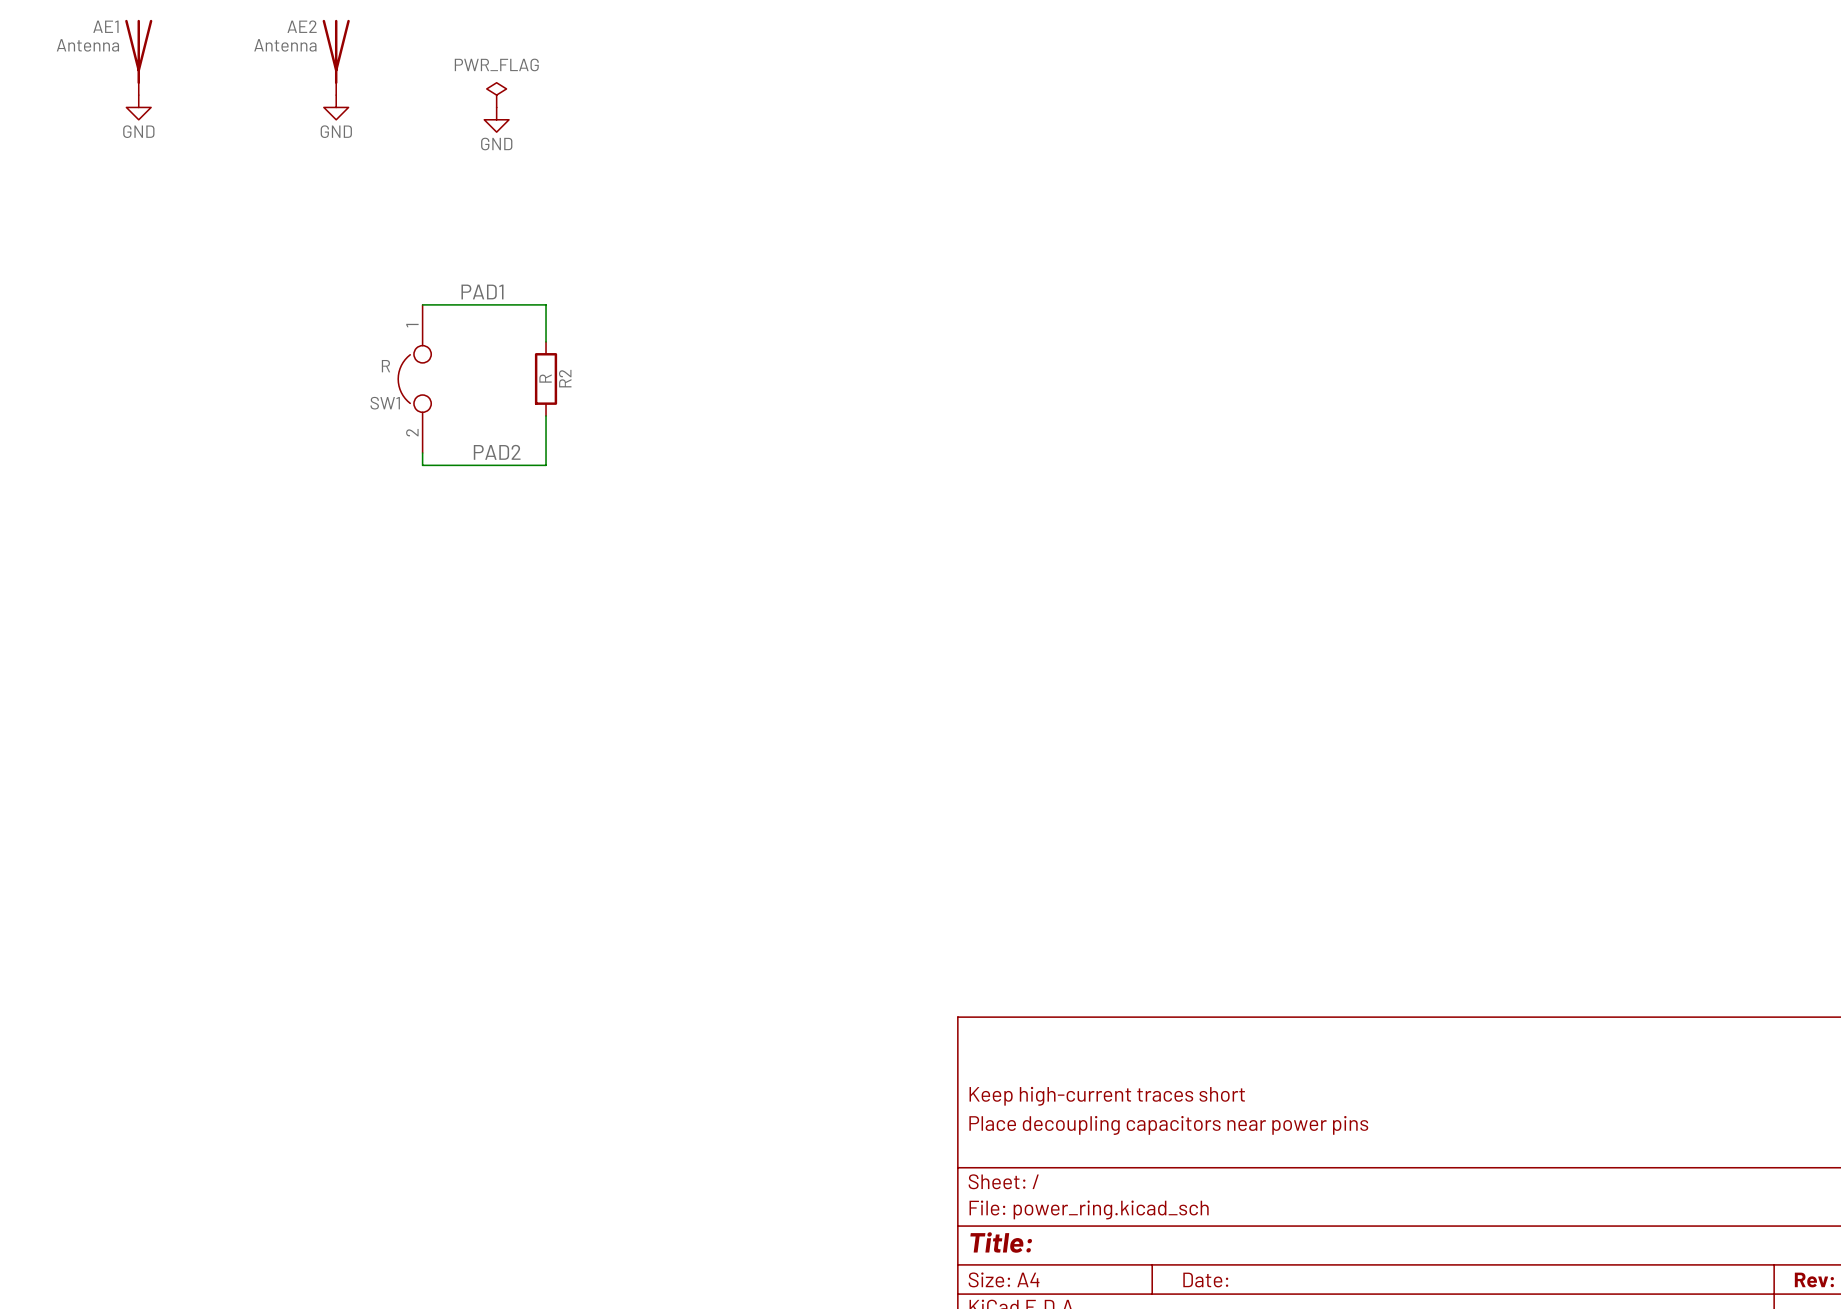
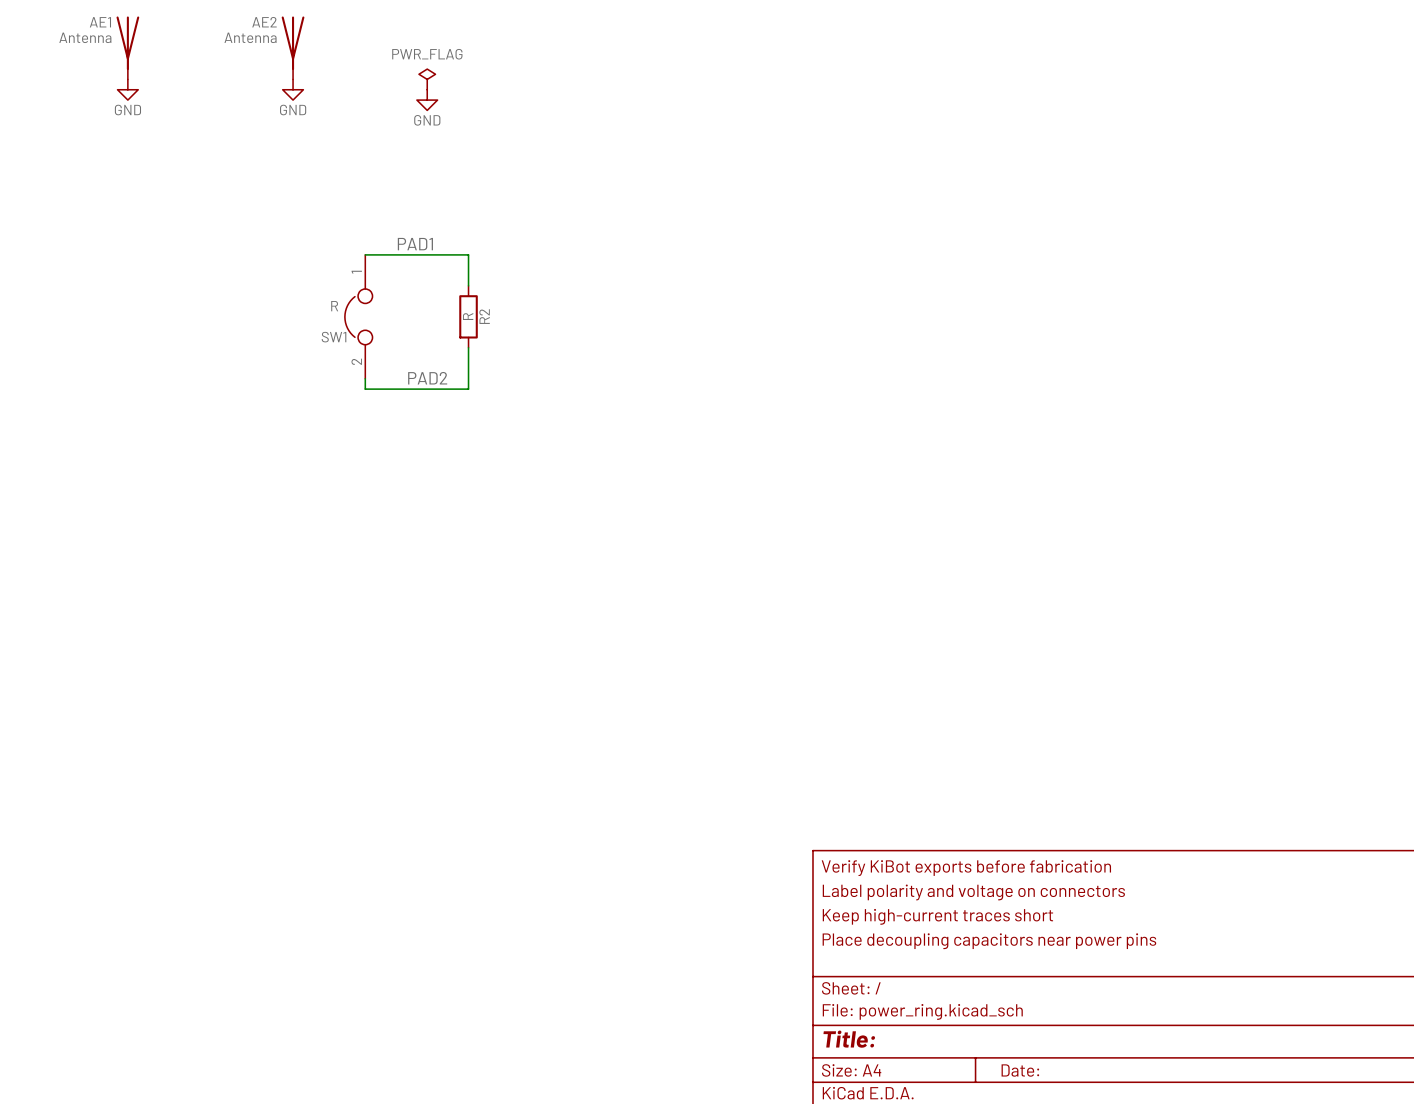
title block: none -> Verify KiBot exports before fabrication (966, 868)
title block: none -> Label polarity and voltage on connectors (973, 892)

